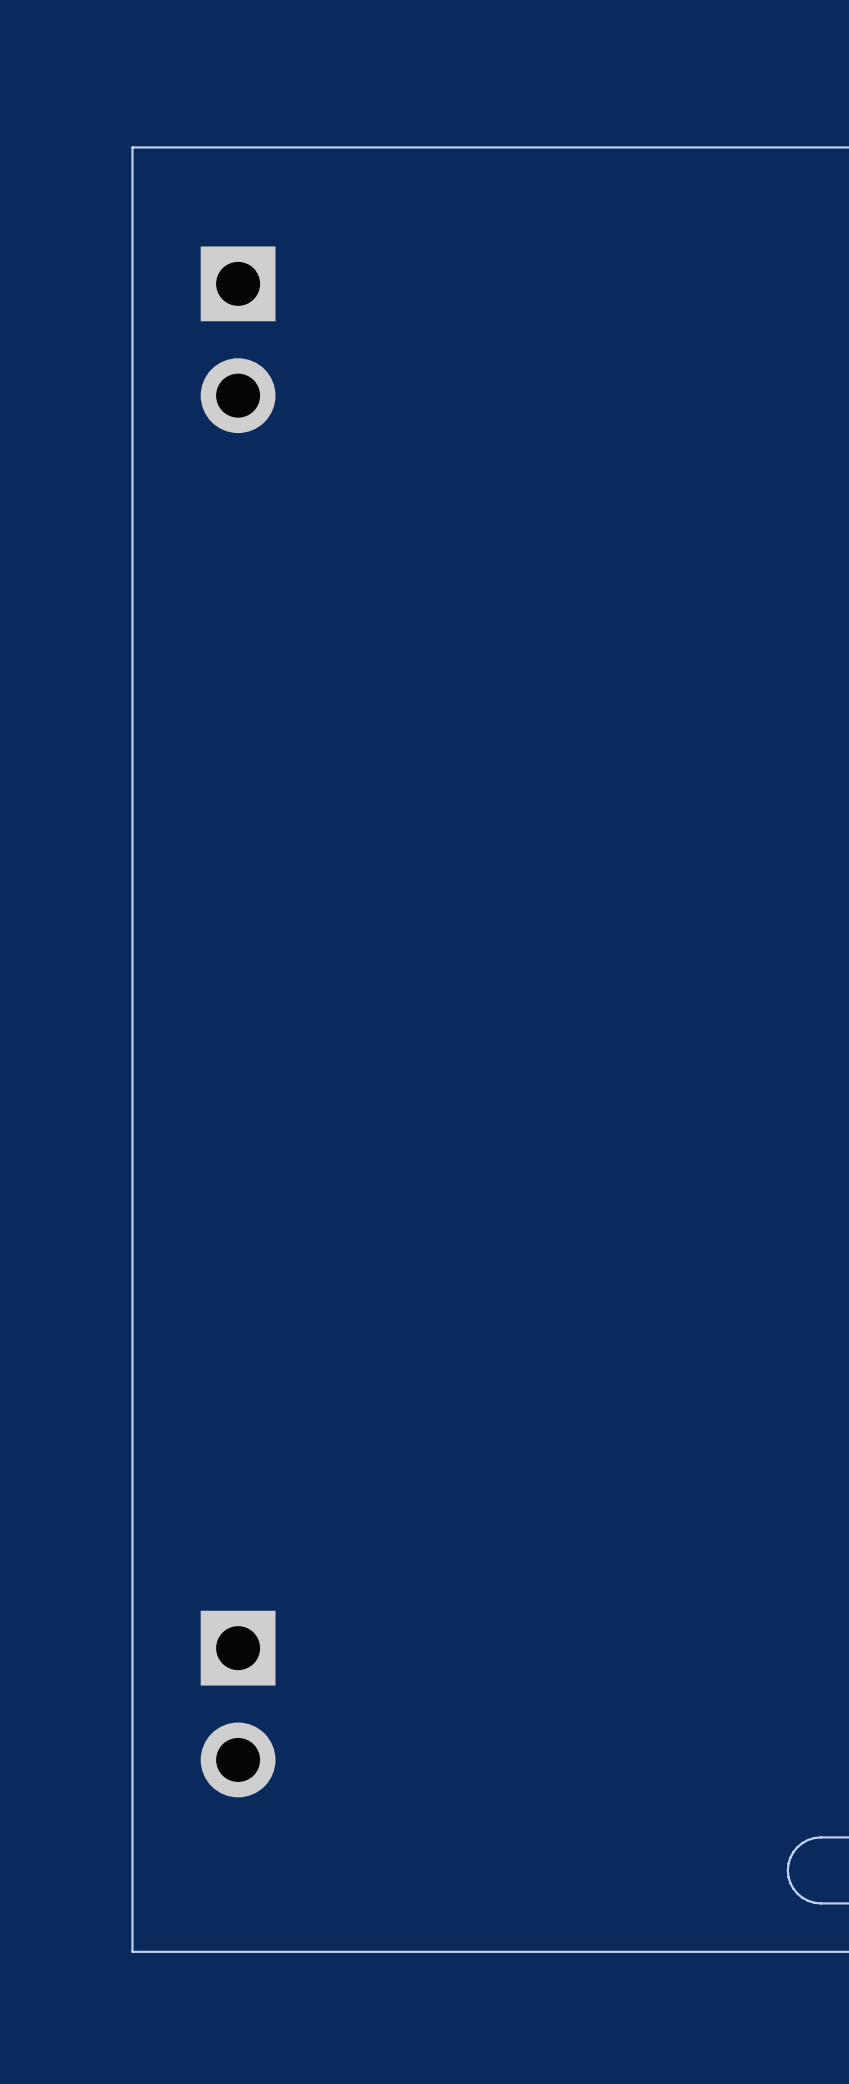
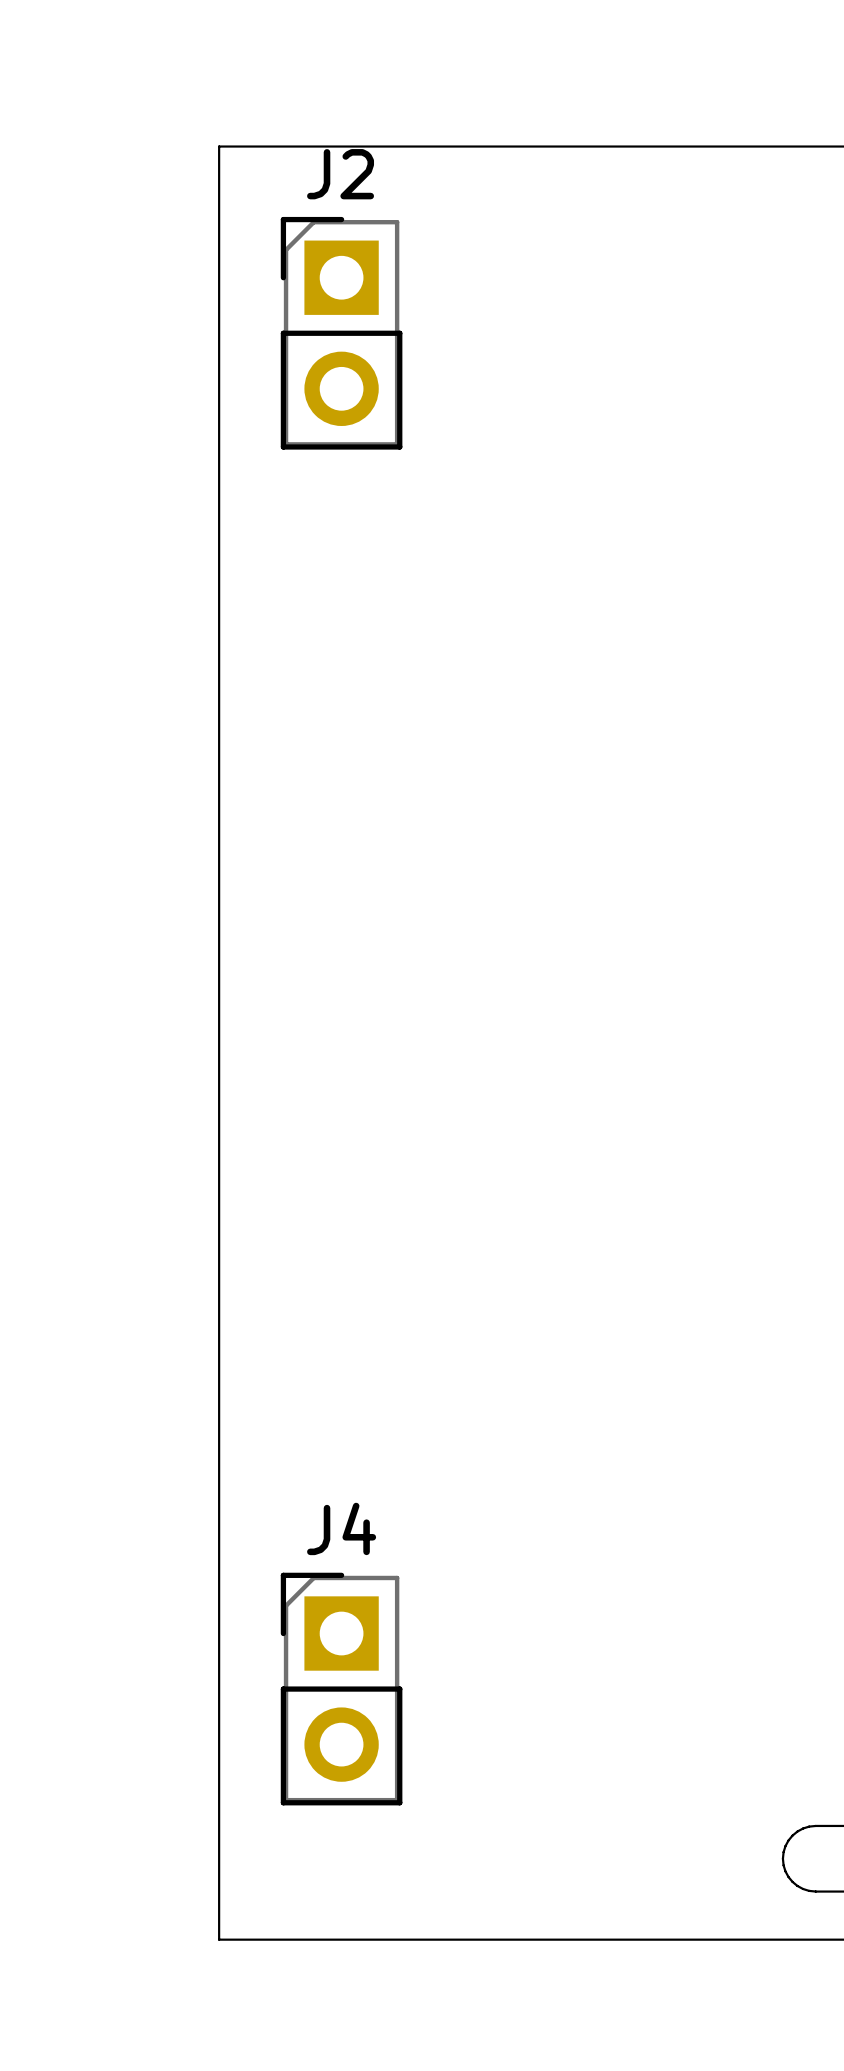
board edge: (220, 147) (132, 147) (132, 1951) (220, 1951) -> (219, 146) (219, 1939)
J2 side: top (238, 339) -> bottom (341, 333)
J4 side: top (238, 1704) -> bottom (341, 1689)

